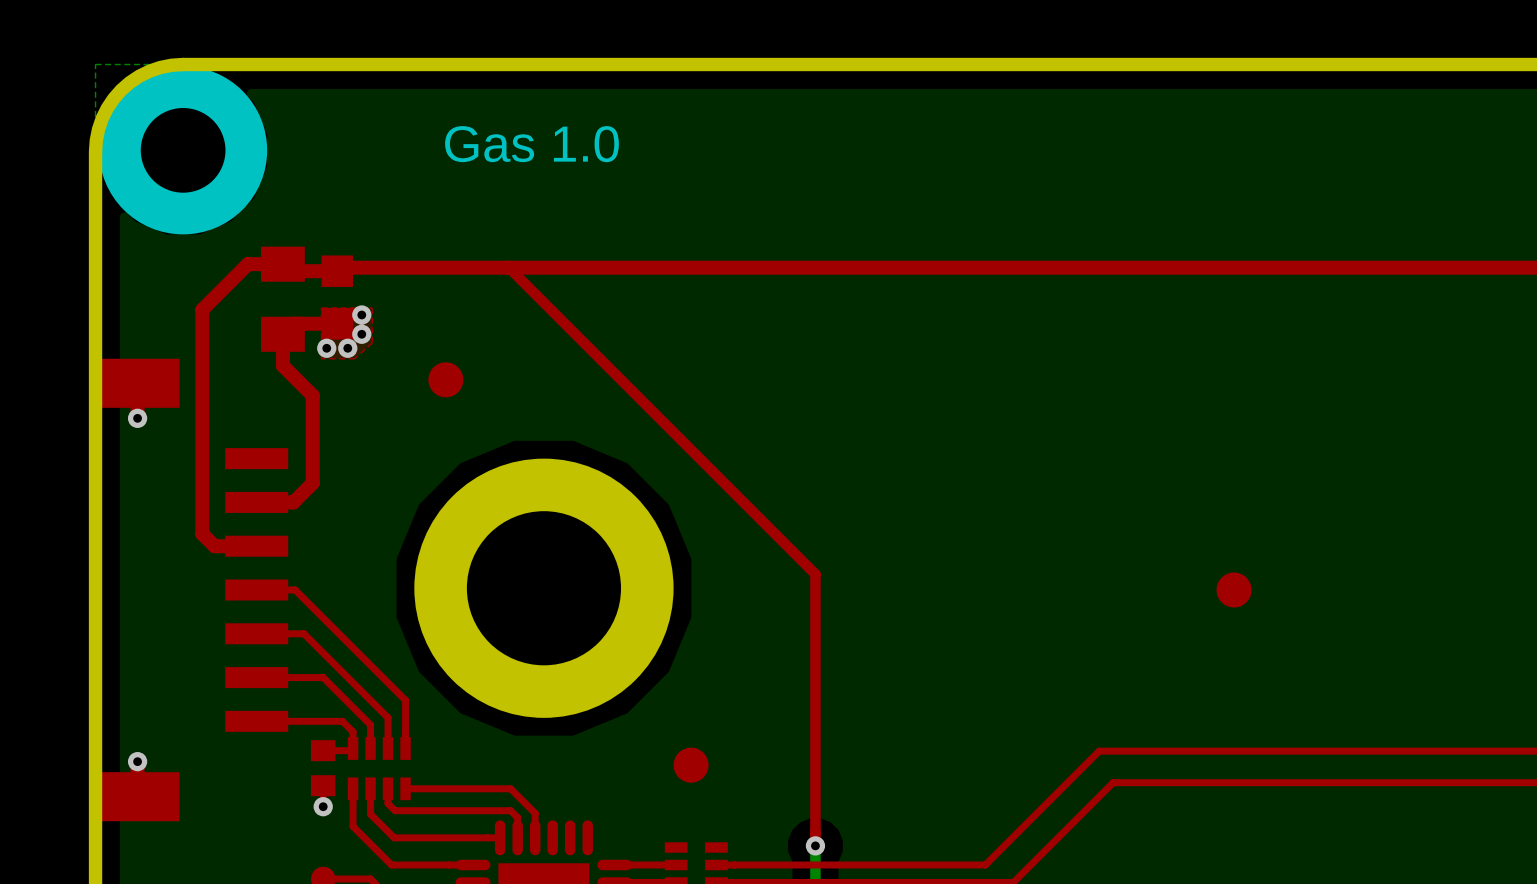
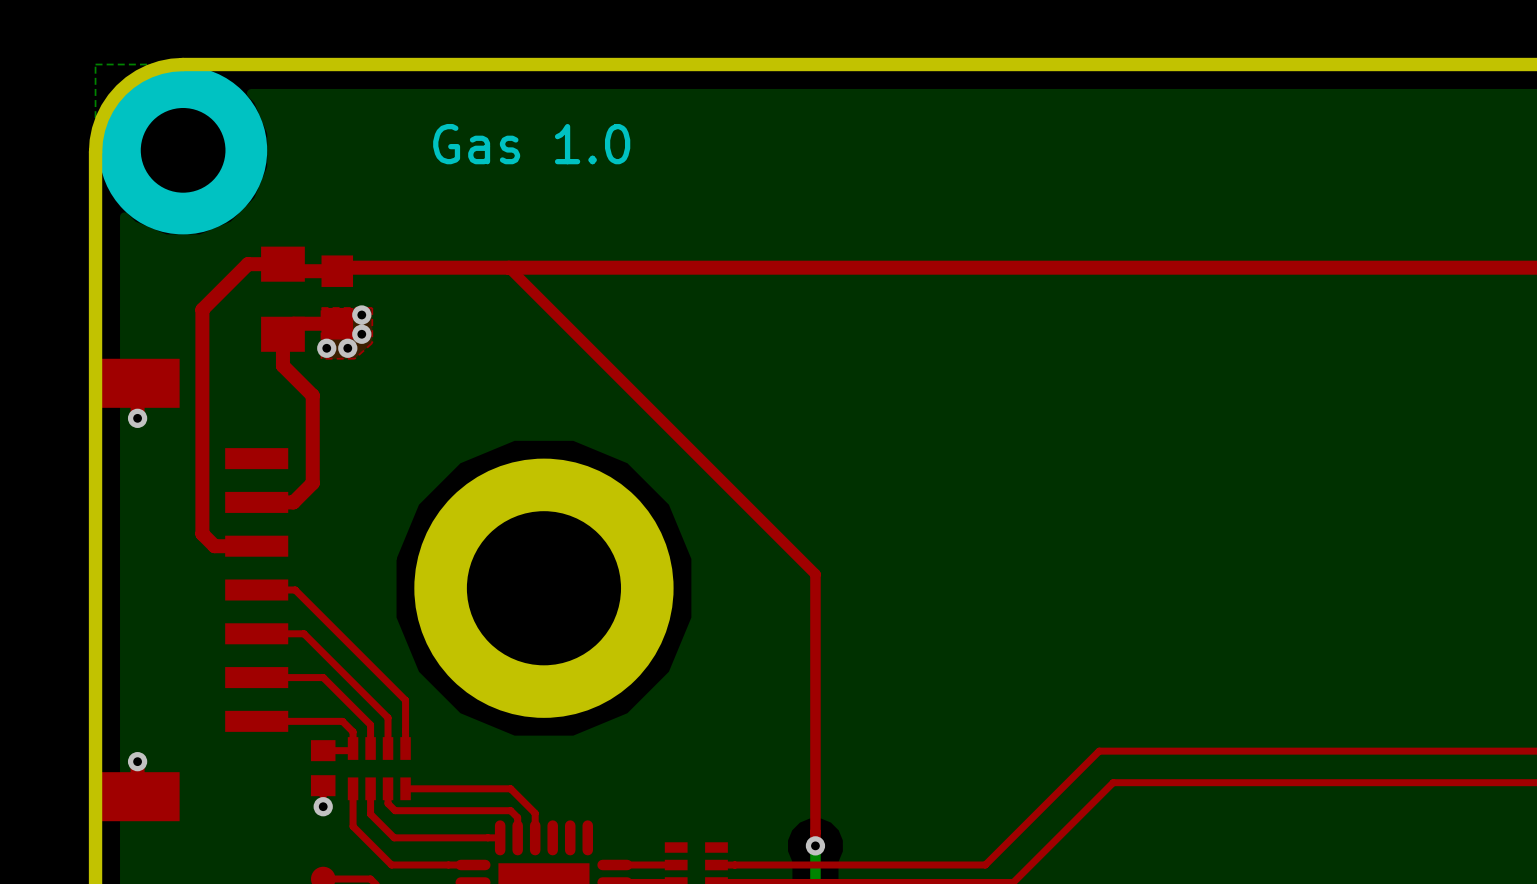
part: (445, 379) -> none
part: (1234, 589) -> none
part: (691, 765) -> none

